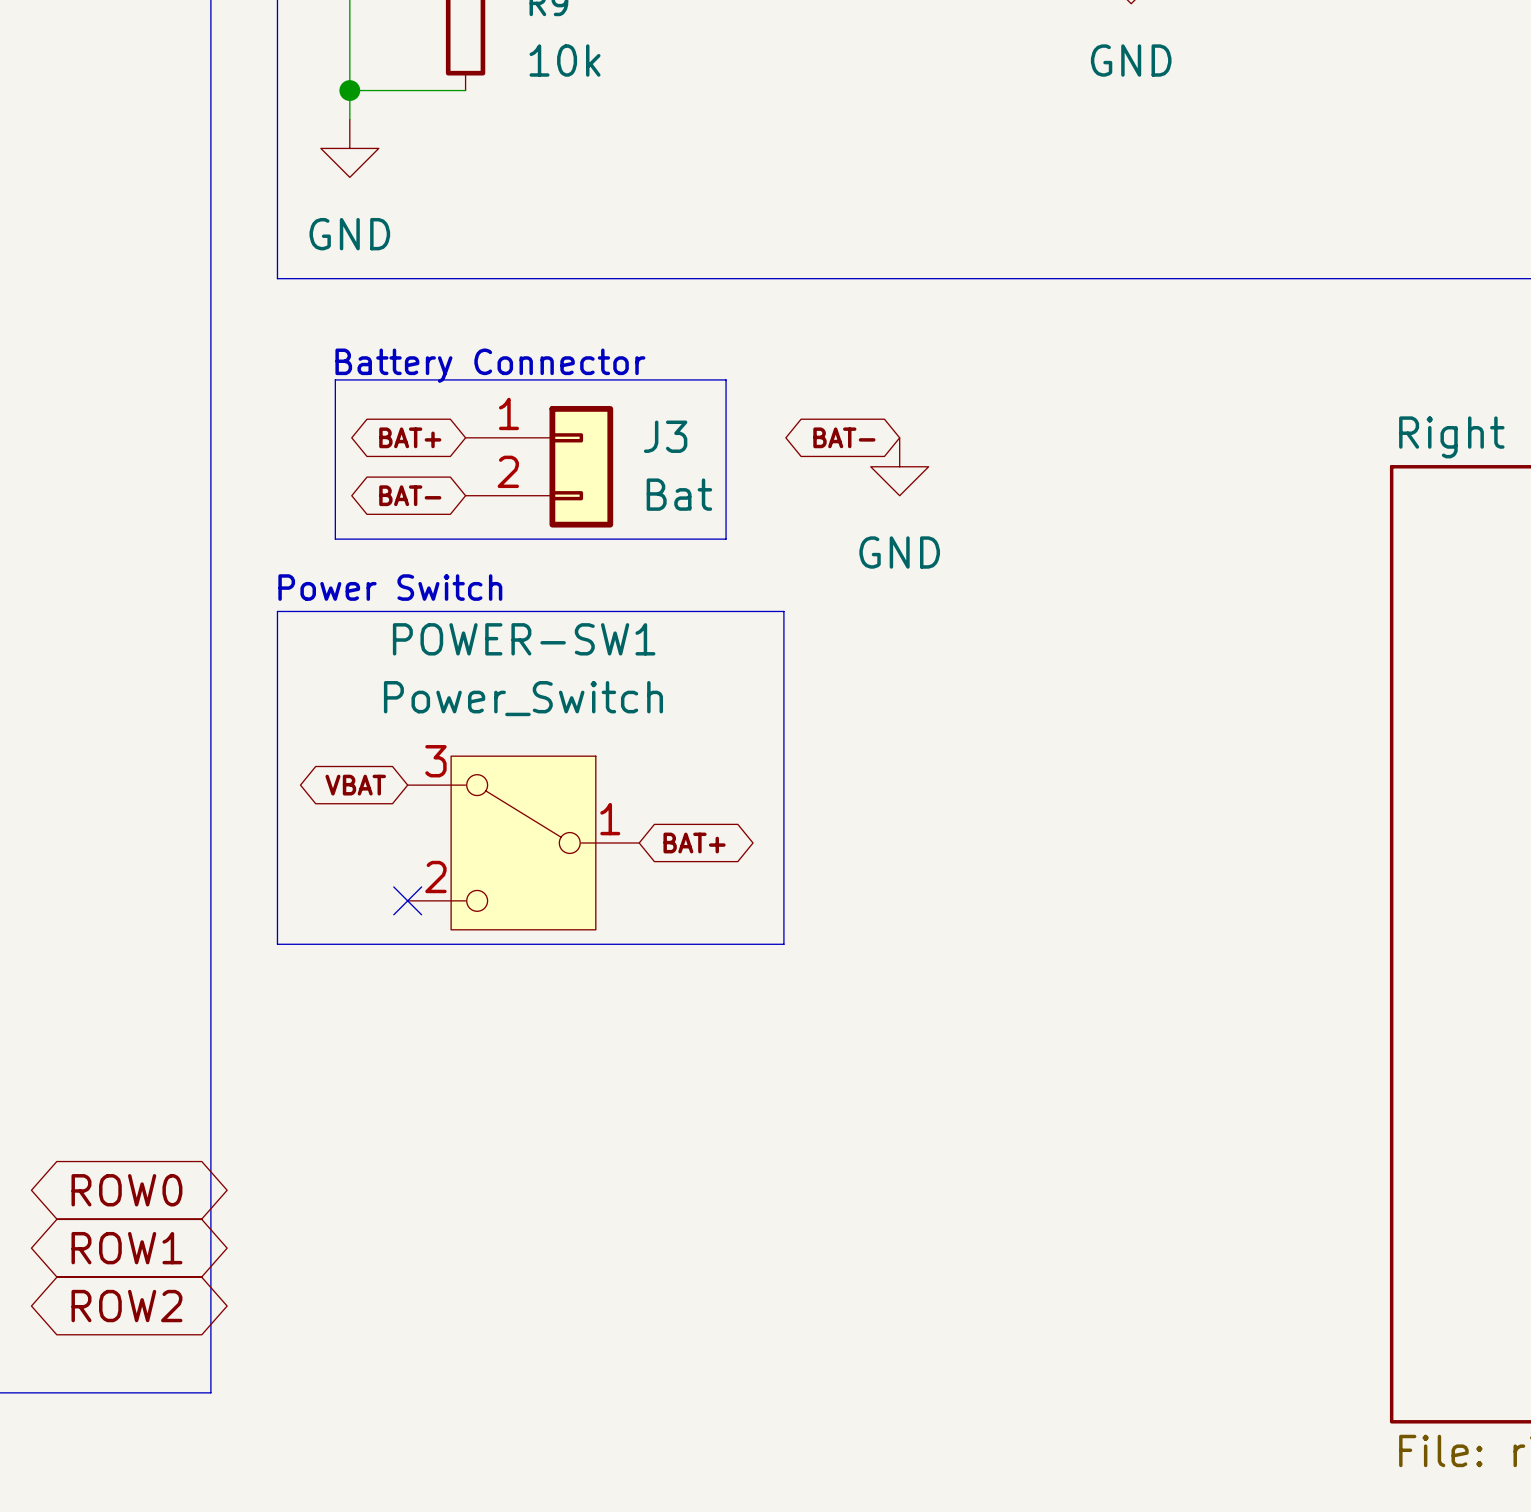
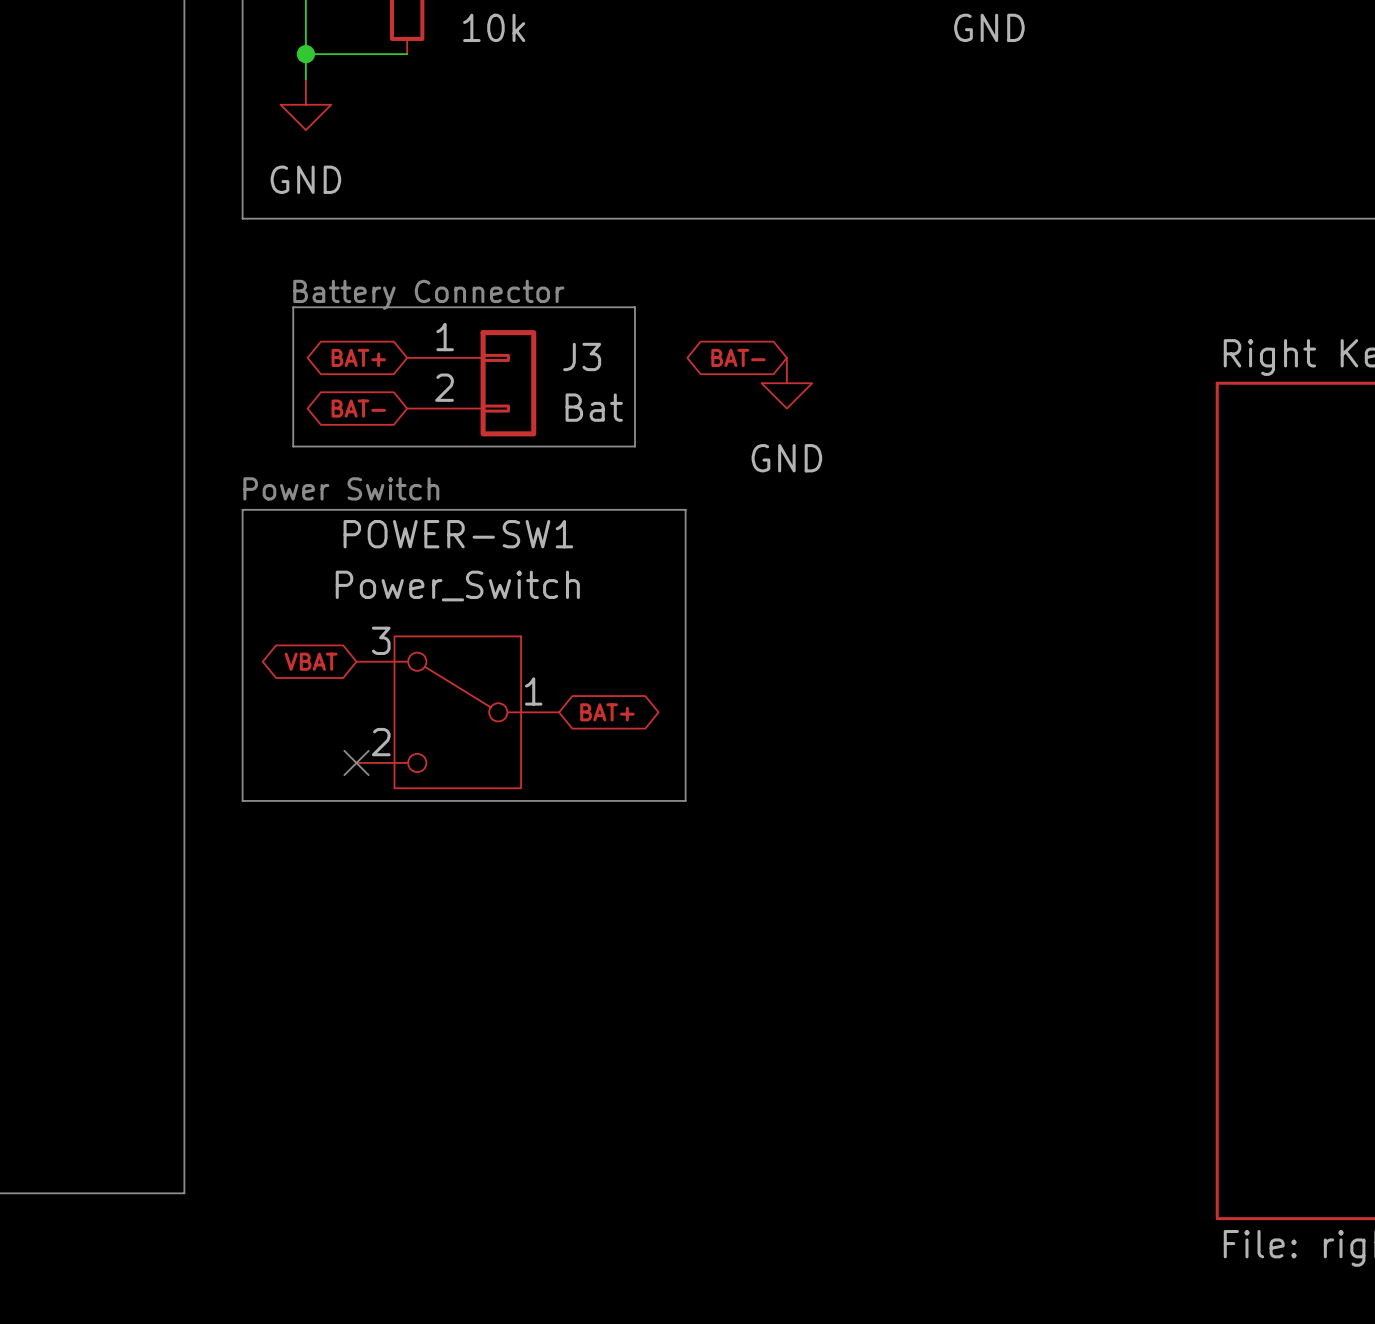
global label: ROW0 (126, 1190) -> none
global label: ROW1 (126, 1248) -> none
global label: ROW2 (126, 1306) -> none

